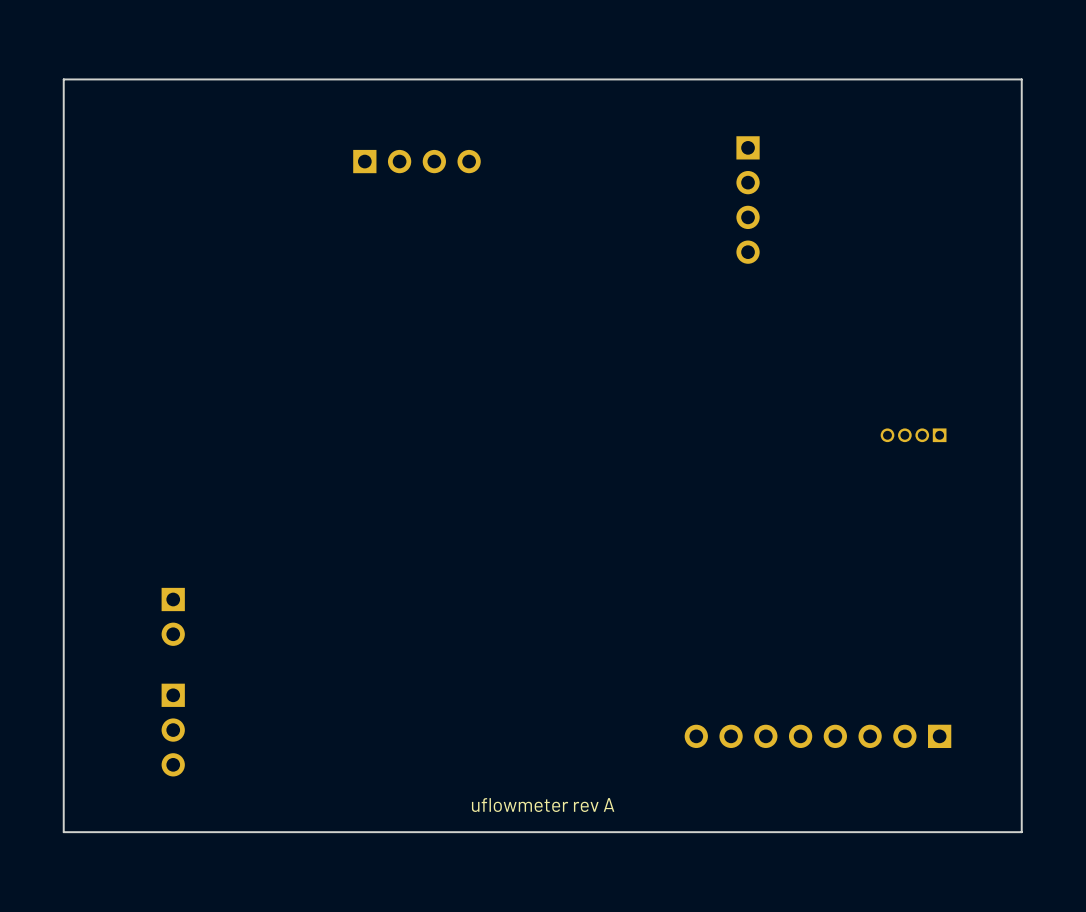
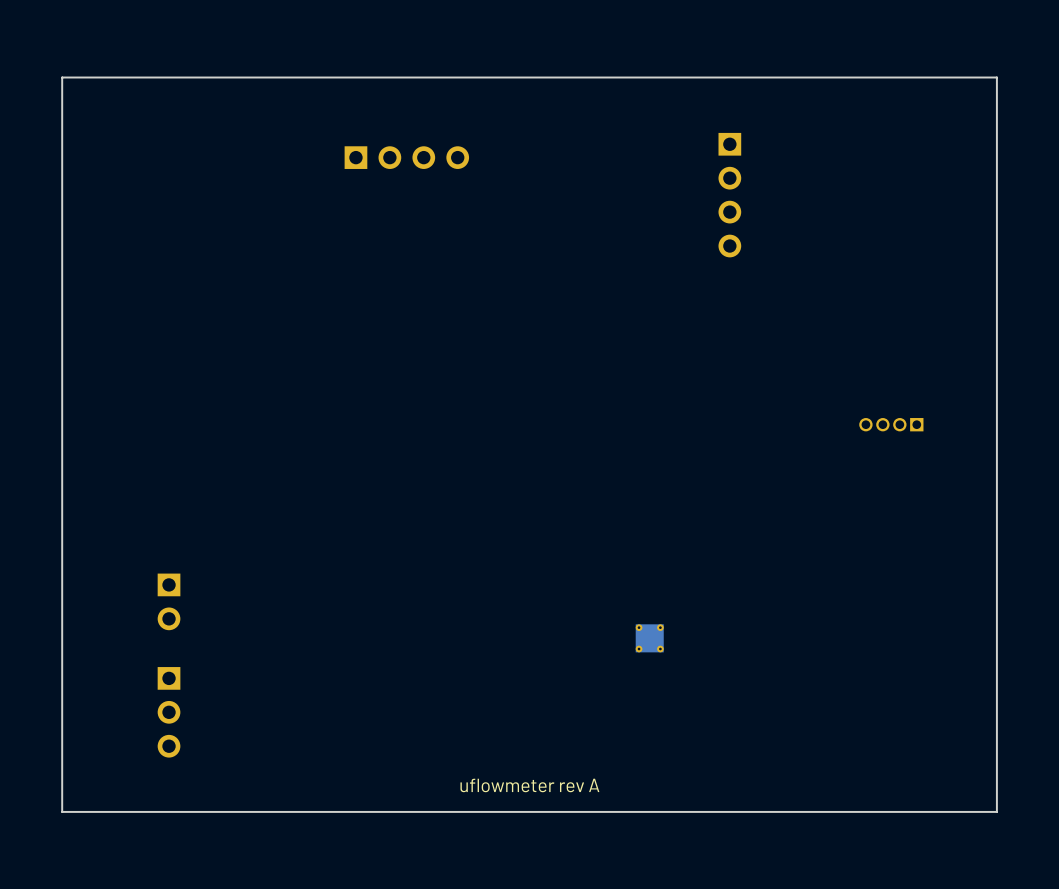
part: none -> (649, 638)
part: (817, 736) -> none

